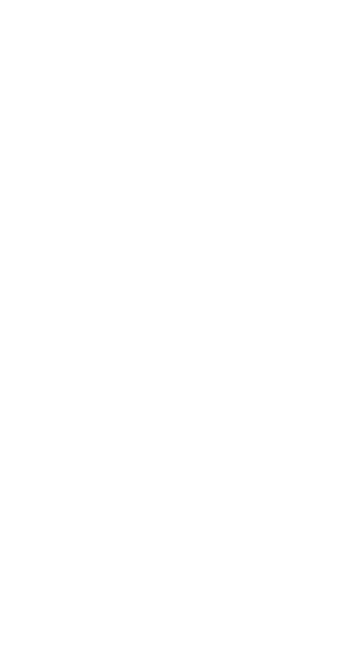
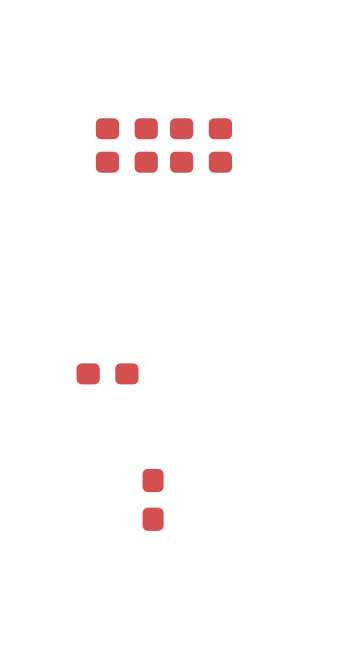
part: none -> (126, 128)
part: none -> (201, 128)
part: none -> (126, 162)
part: none -> (201, 162)
part: none -> (107, 373)
part: none -> (153, 499)

